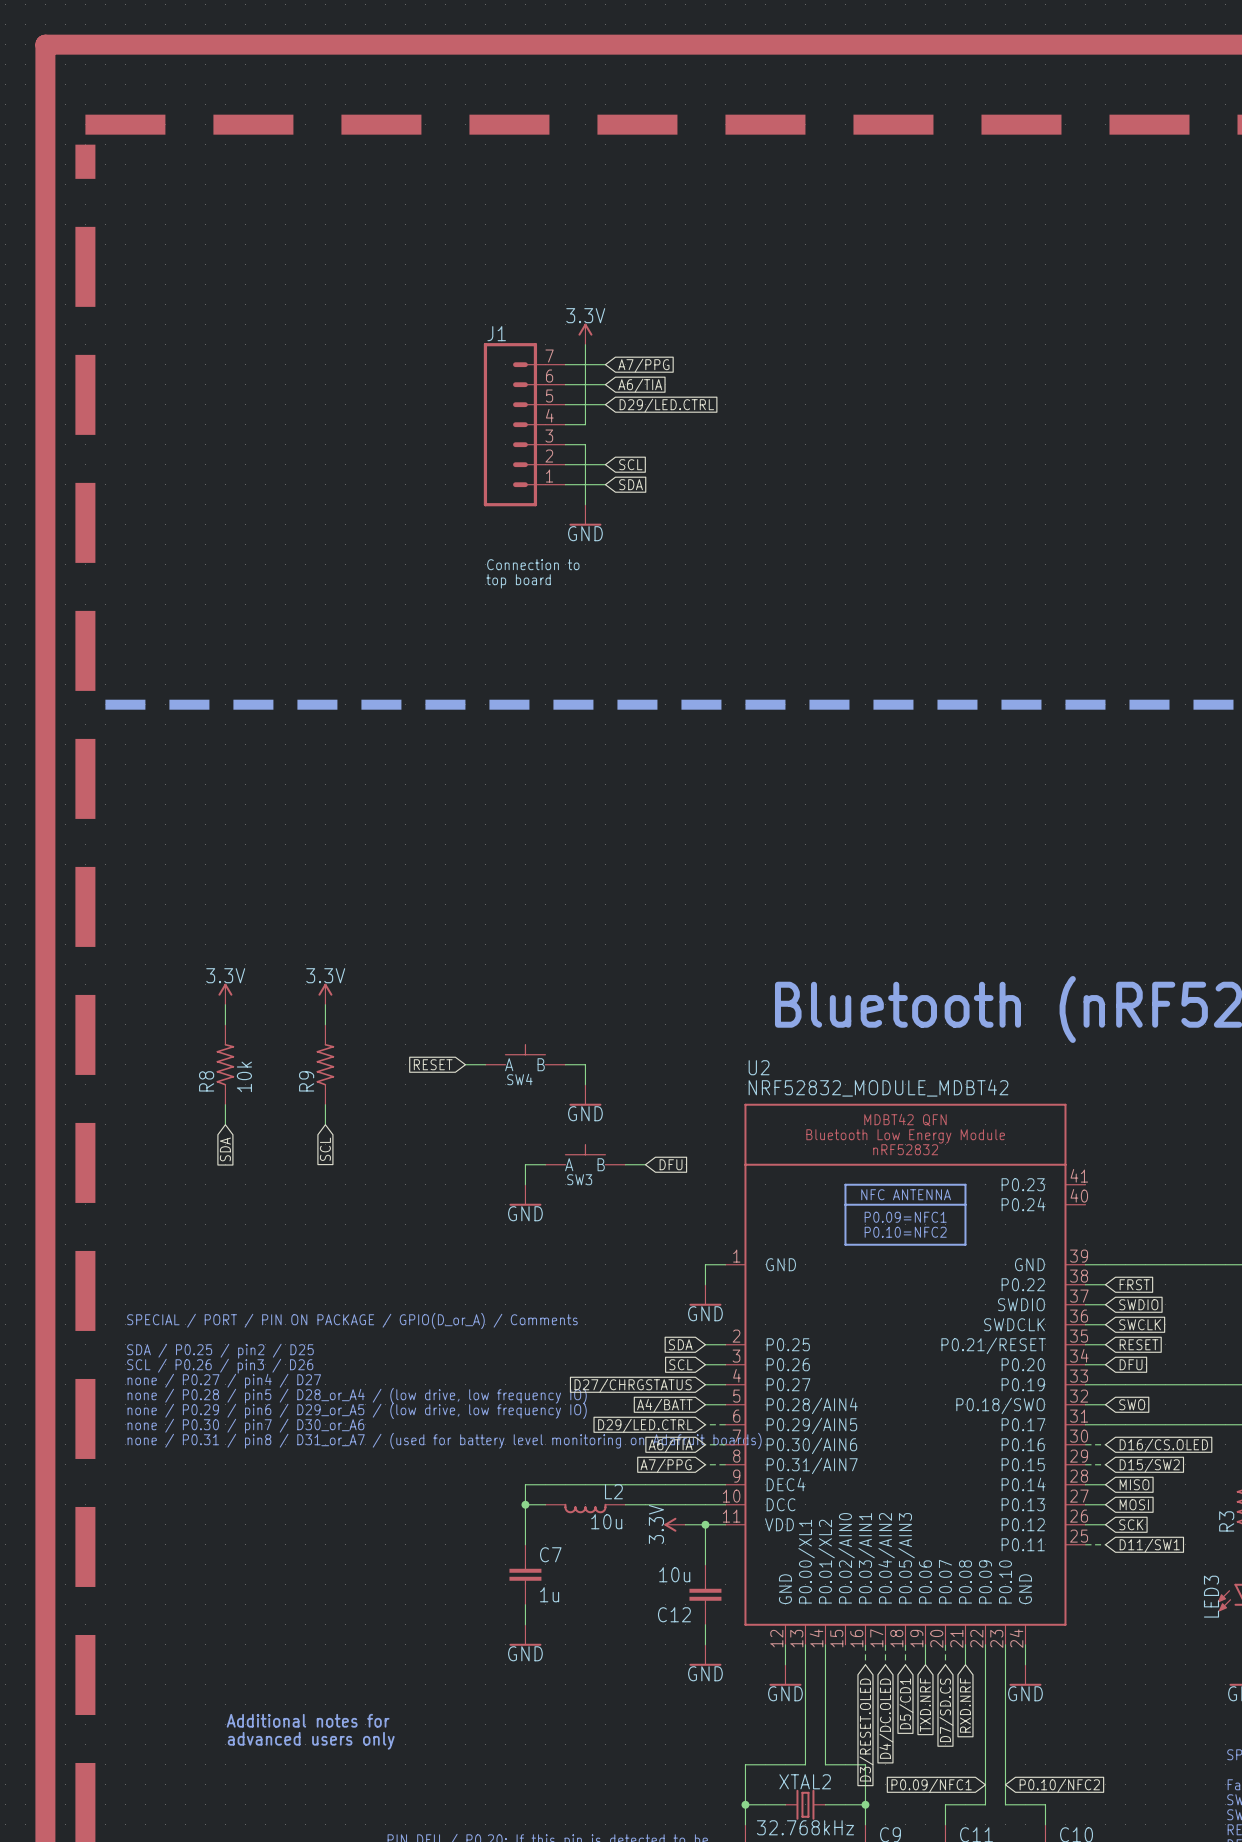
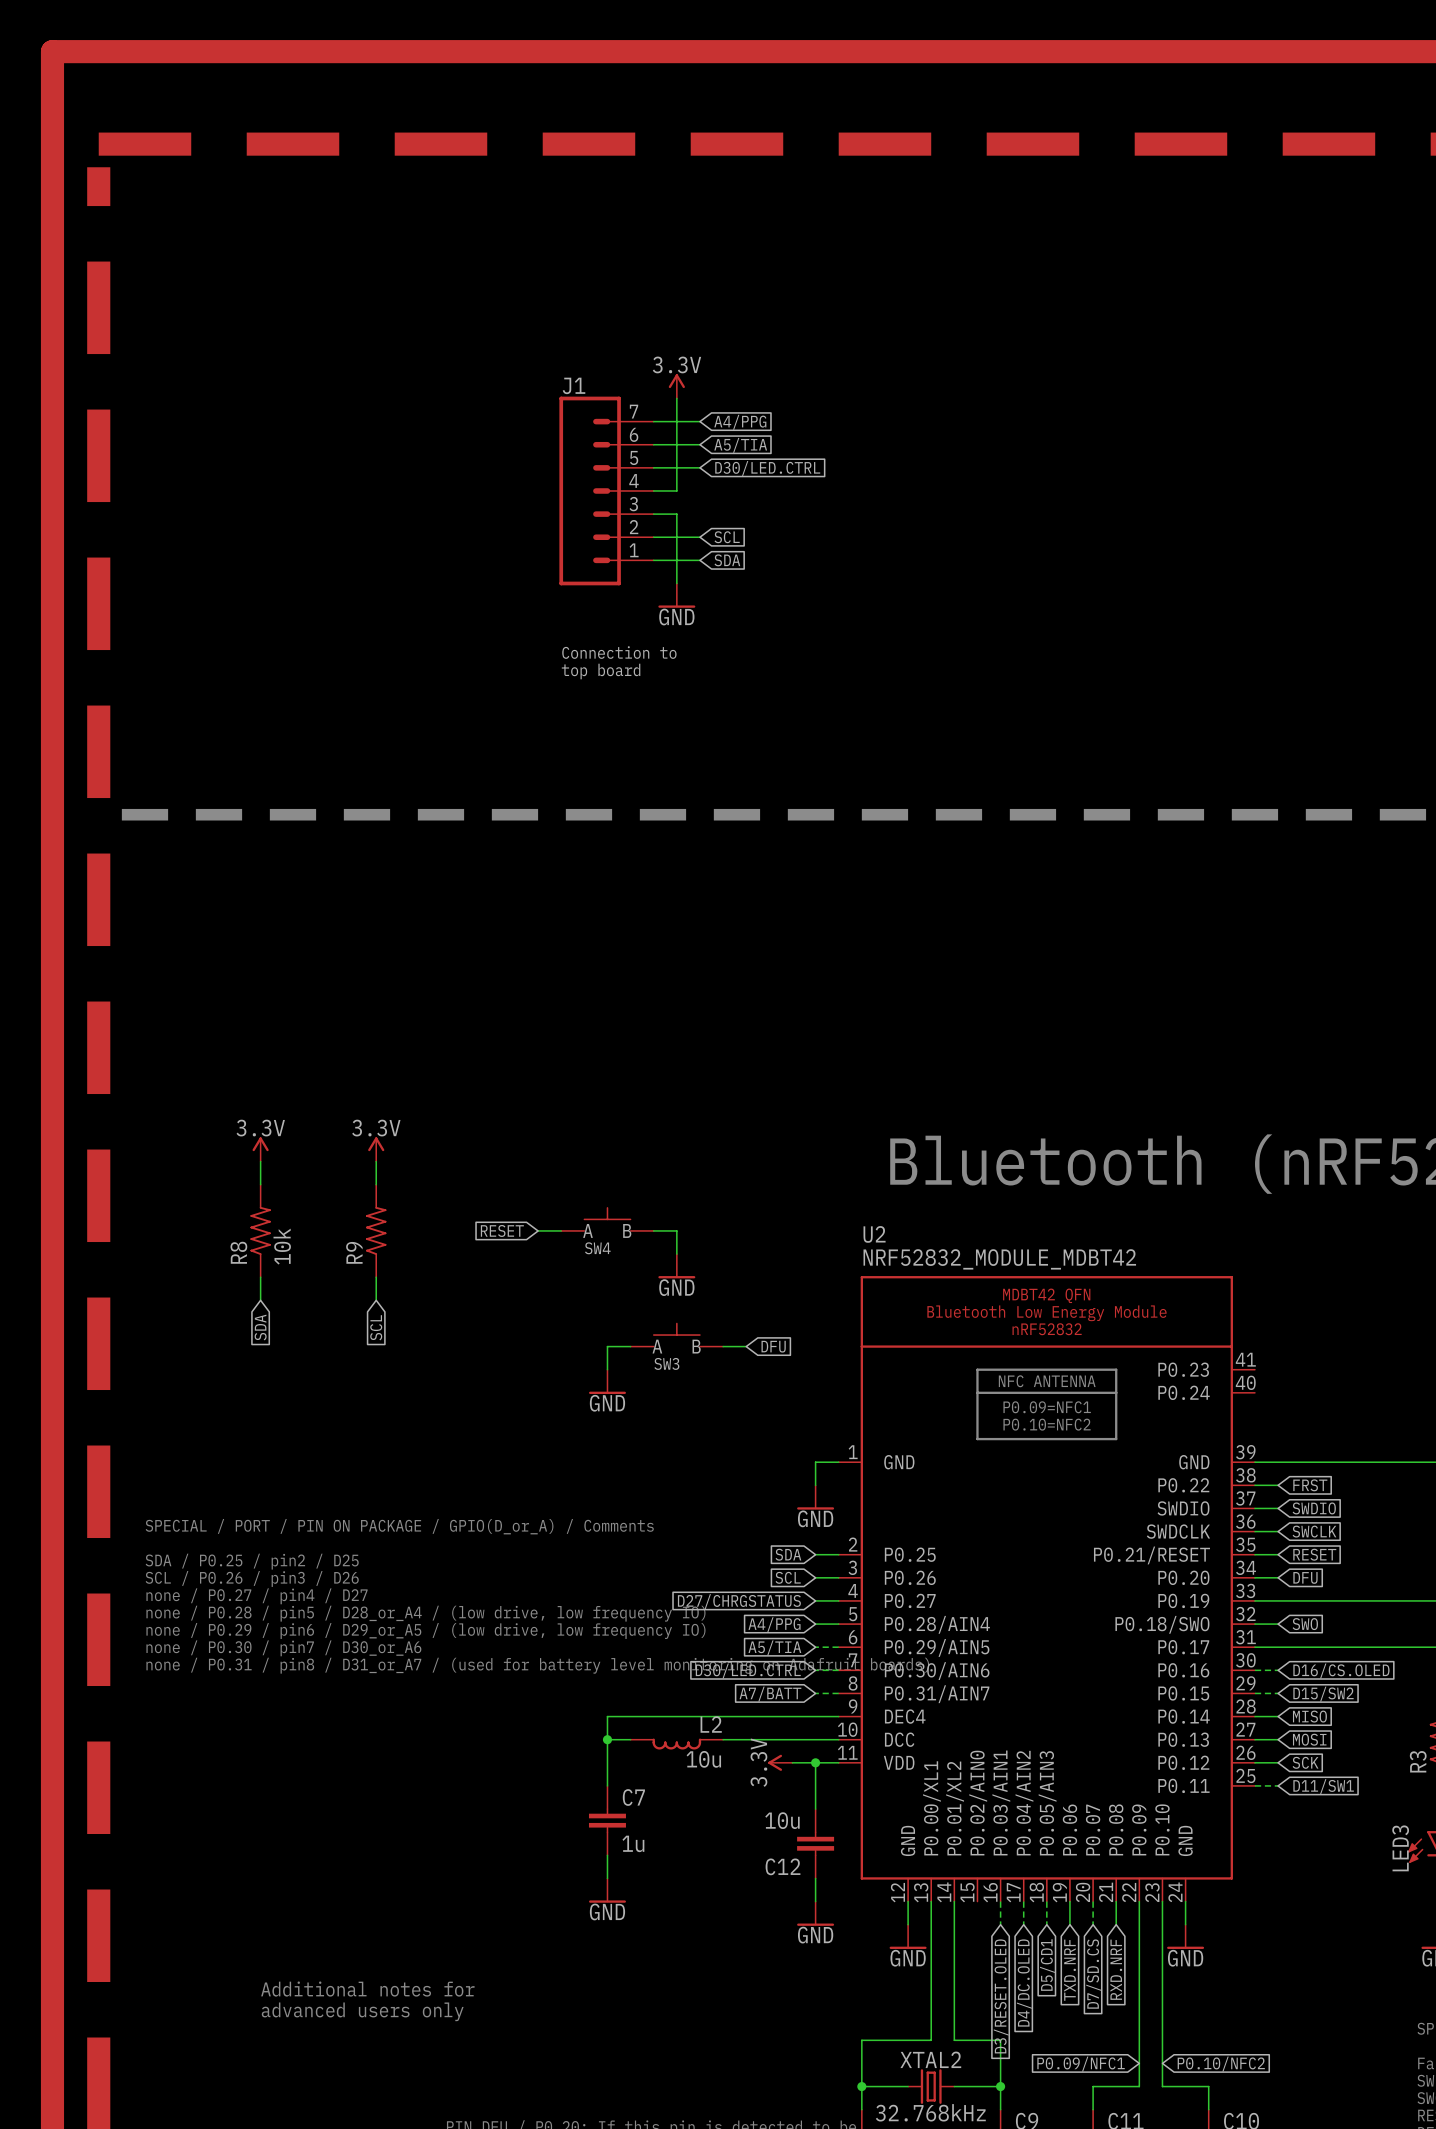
global label: A7/PPG (643, 365) -> A4/PPG (740, 422)
global label: A6/TIA (640, 385) -> A5/TIA (740, 445)
global label: D29/LED.CTRL (666, 405) -> D30/LED.CTRL (767, 468)
global label: A4/BATT (664, 1405) -> A4/PPG (774, 1624)
global label: D29/LED.CTRL (645, 1425) -> A5/TIA (774, 1647)
global label: A6/TIA (670, 1445) -> D30/LED.CTRL (748, 1670)
global label: A7/PPG (666, 1465) -> A7/BATT (770, 1694)

